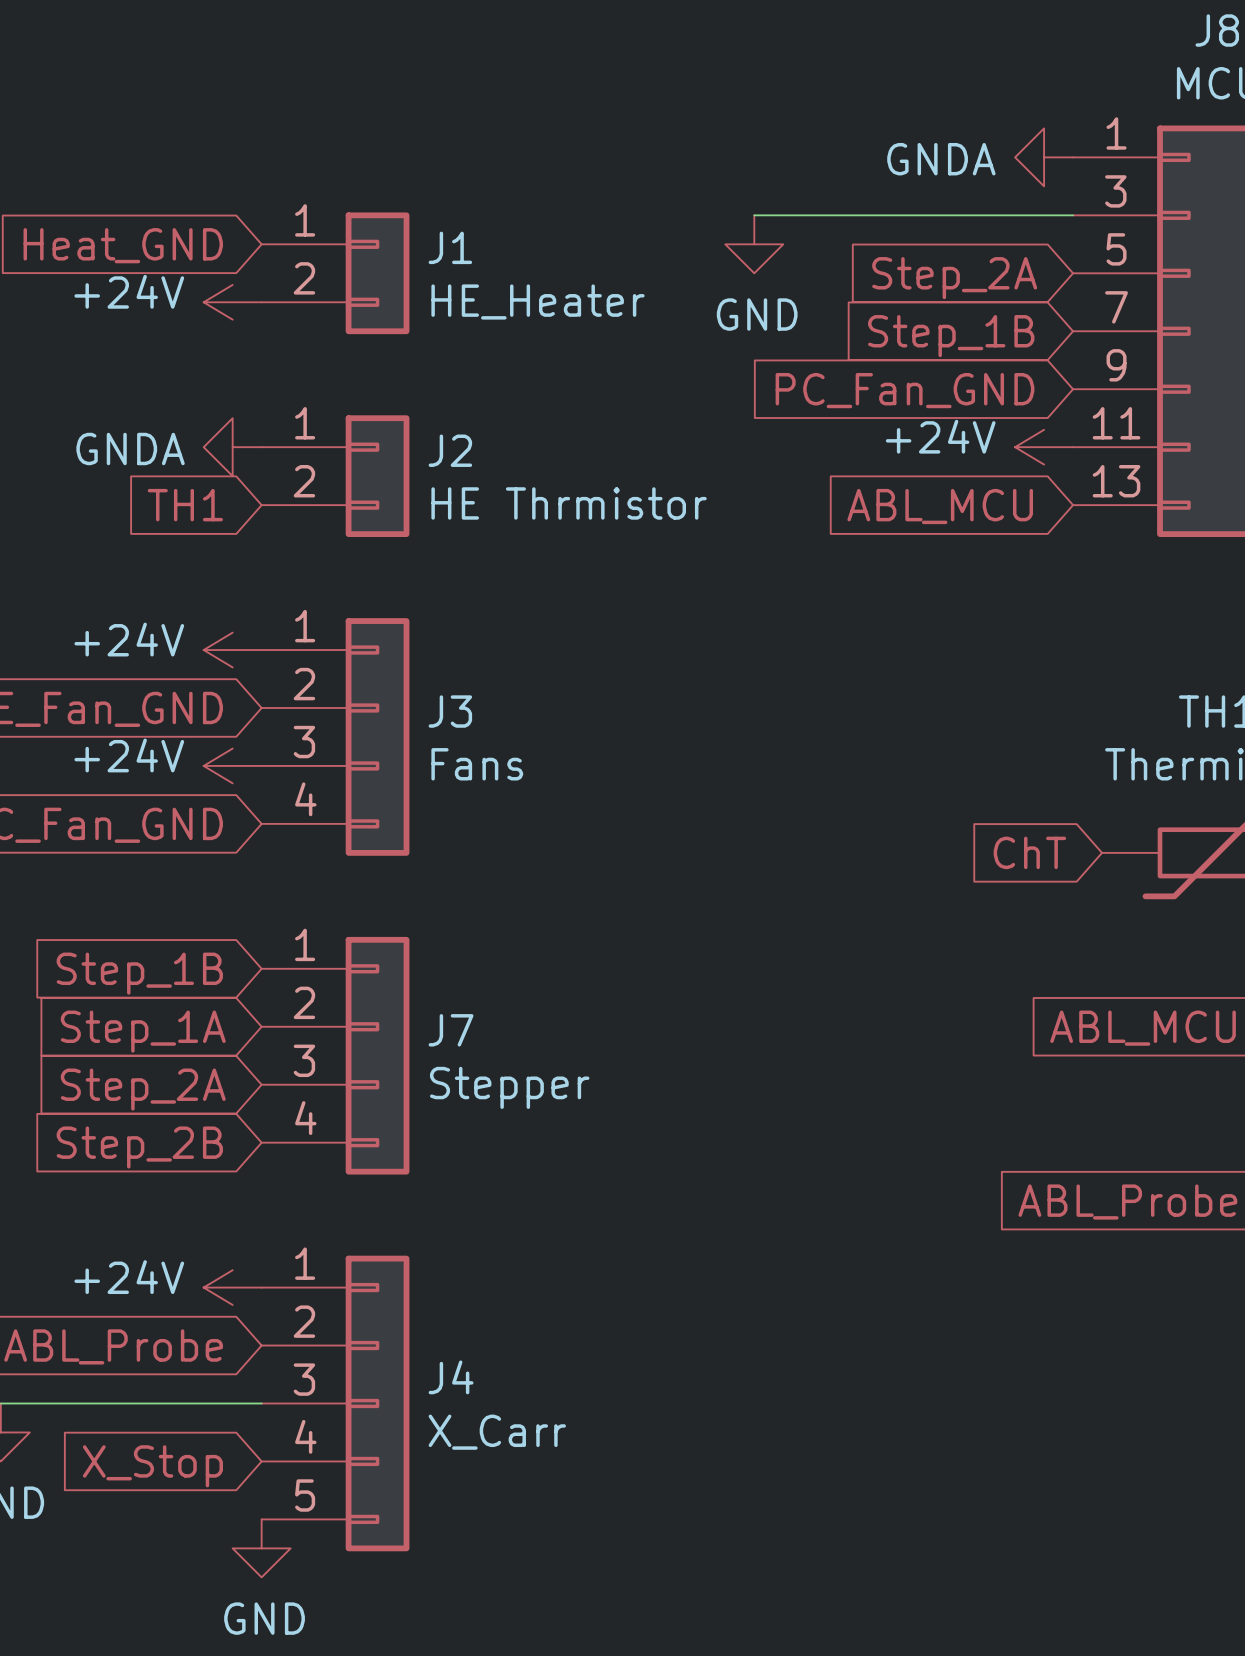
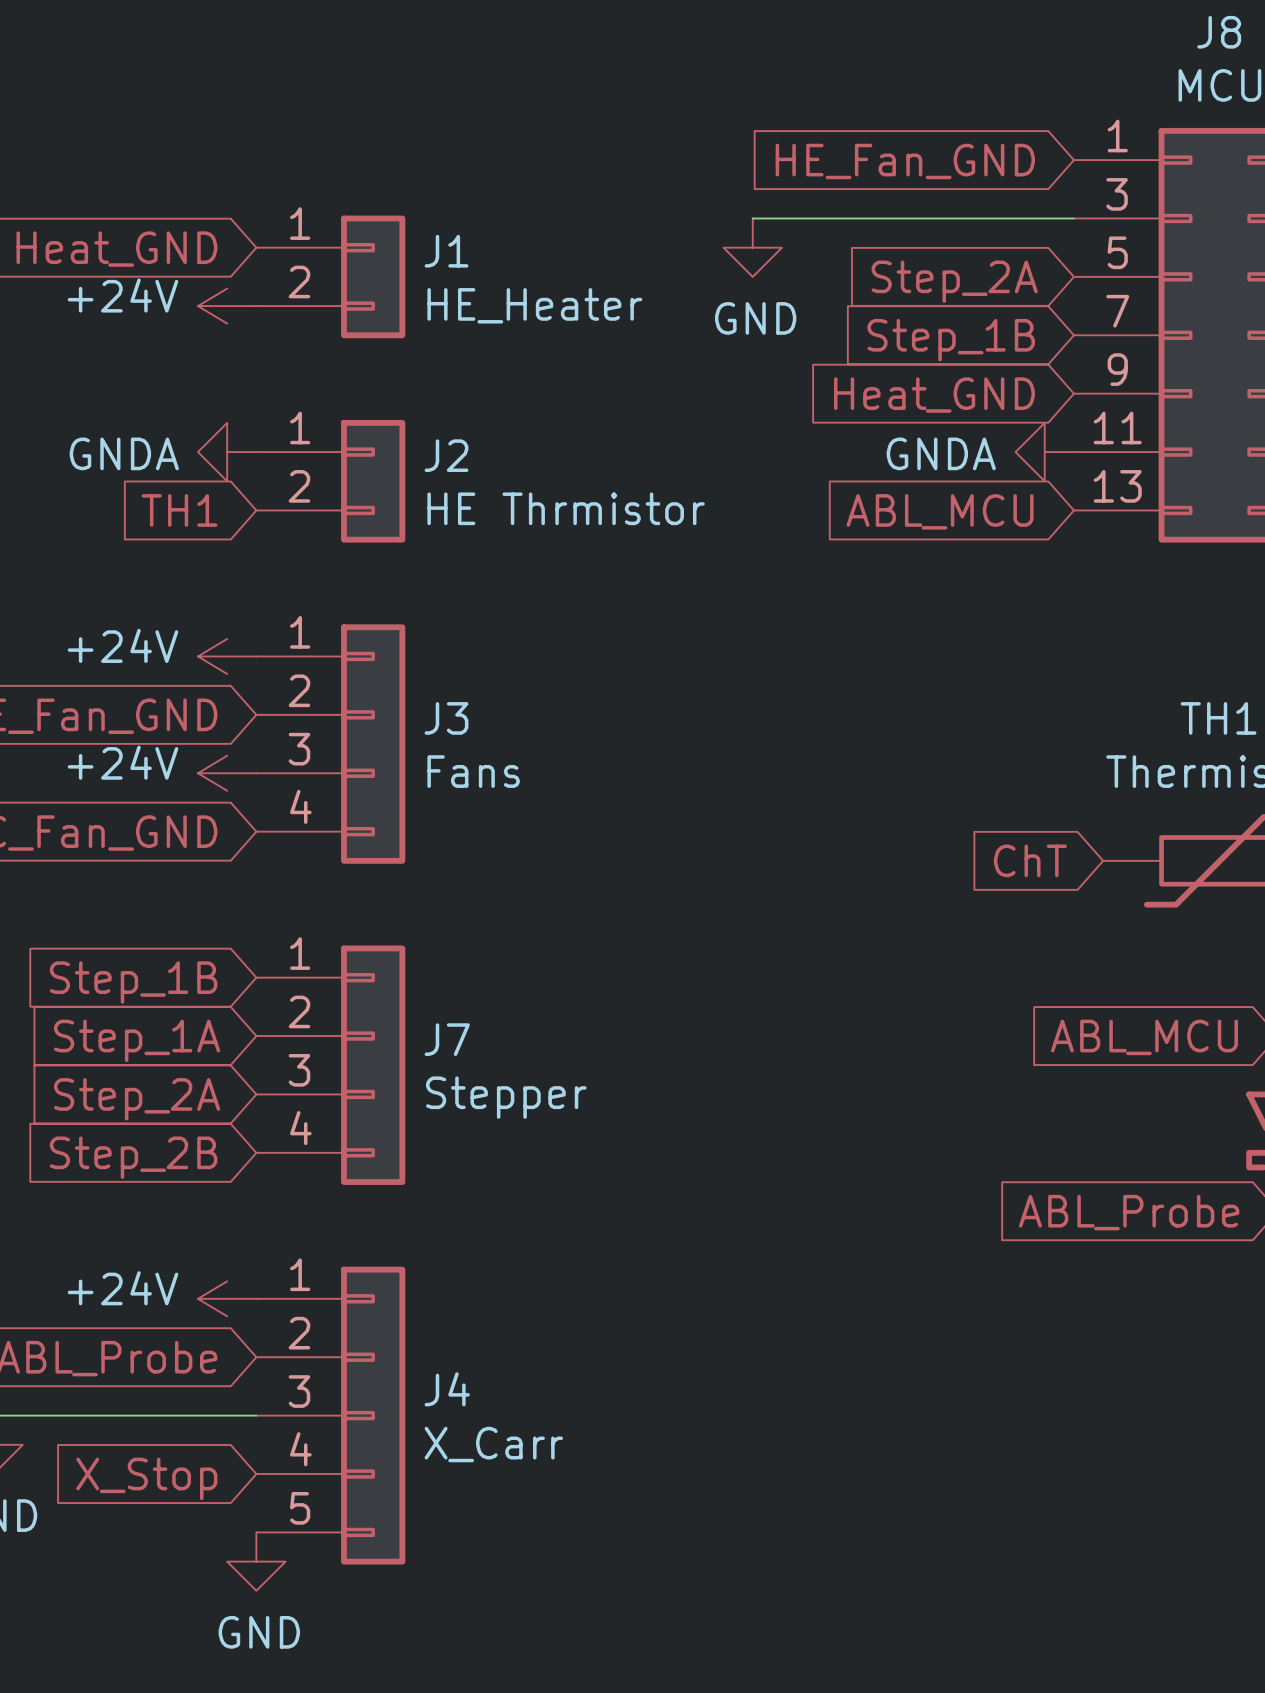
power symbol: GNDA (1044, 157) -> none
global label: none -> HE_Fan_GND (905, 161)
global label: PC_Fan_GND (905, 390) -> Heat_GND (934, 395)
power symbol: +24V (1044, 447) -> GNDA (1044, 452)

